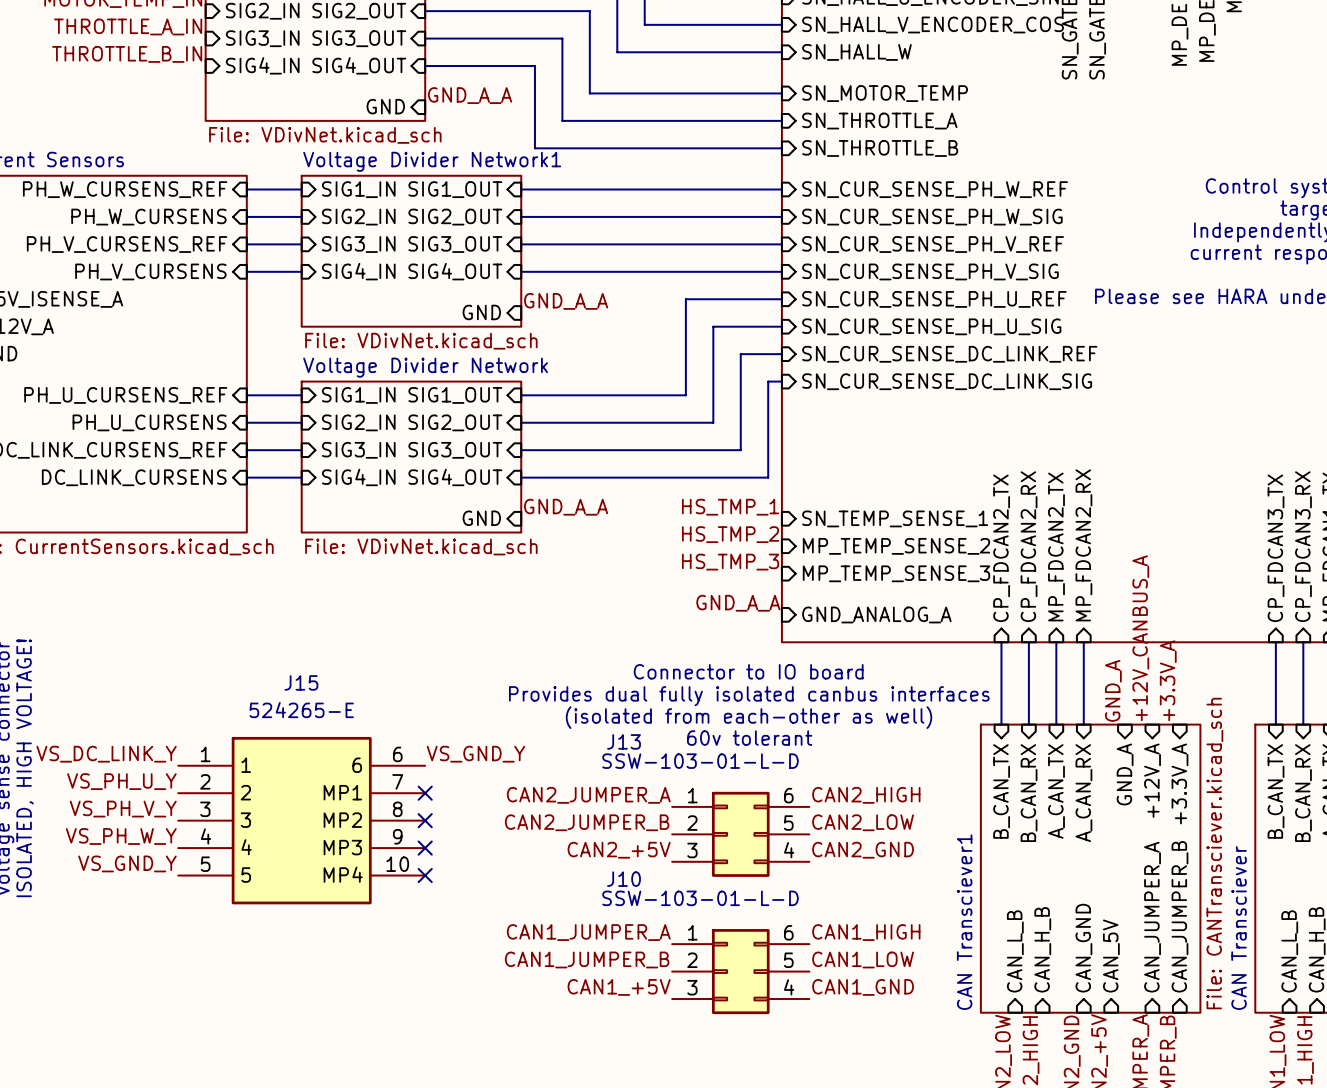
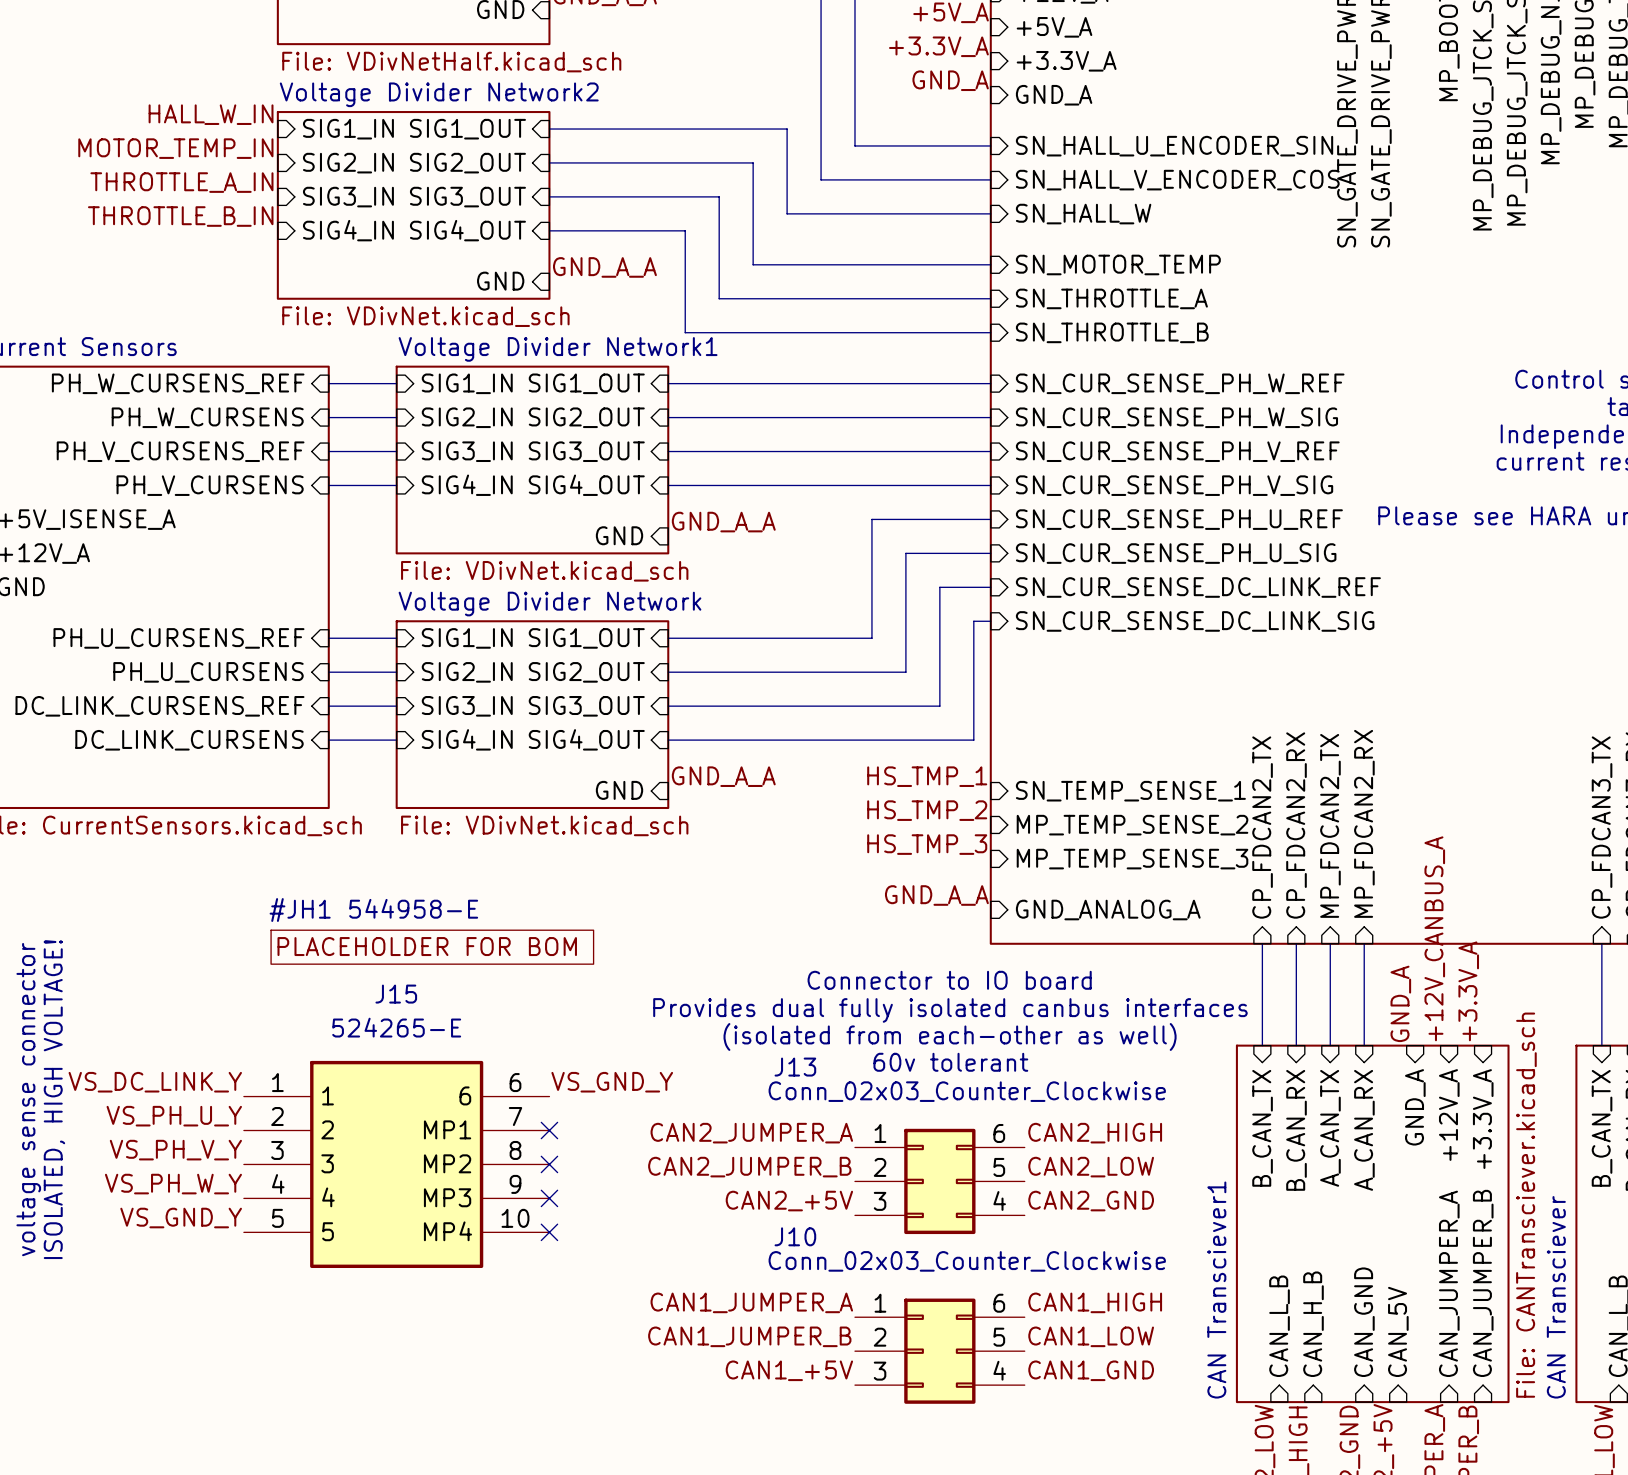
#JH1: none -> 544958-E (432, 947)
J13 value: SSW-103-01-L-D (700, 761) -> Conn_02x03_Counter_Clockwise (967, 1091)
J10 value: SSW-103-01-L-D (700, 898) -> Conn_02x03_Counter_Clockwise (967, 1261)

